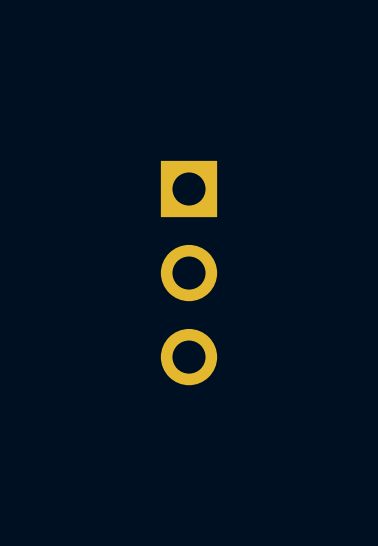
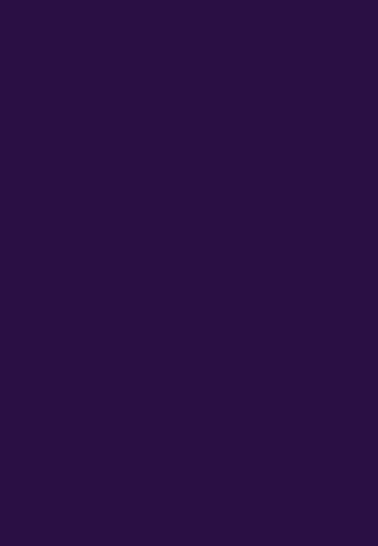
part: (189, 273) -> none

